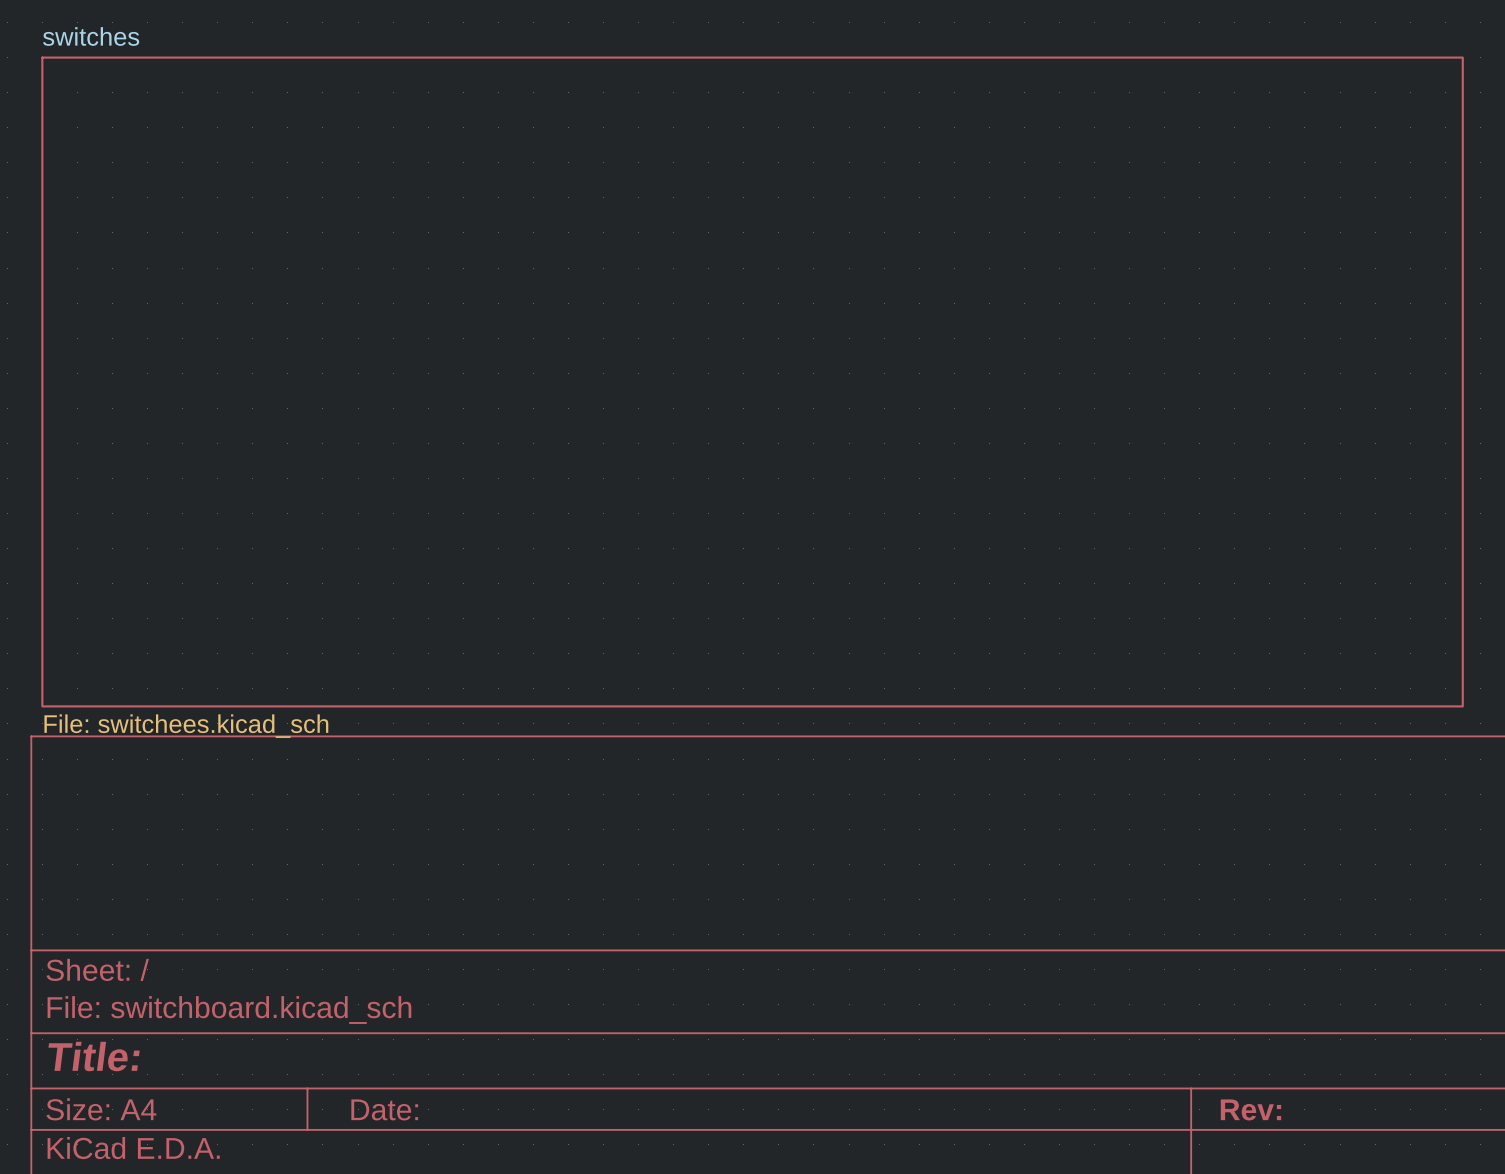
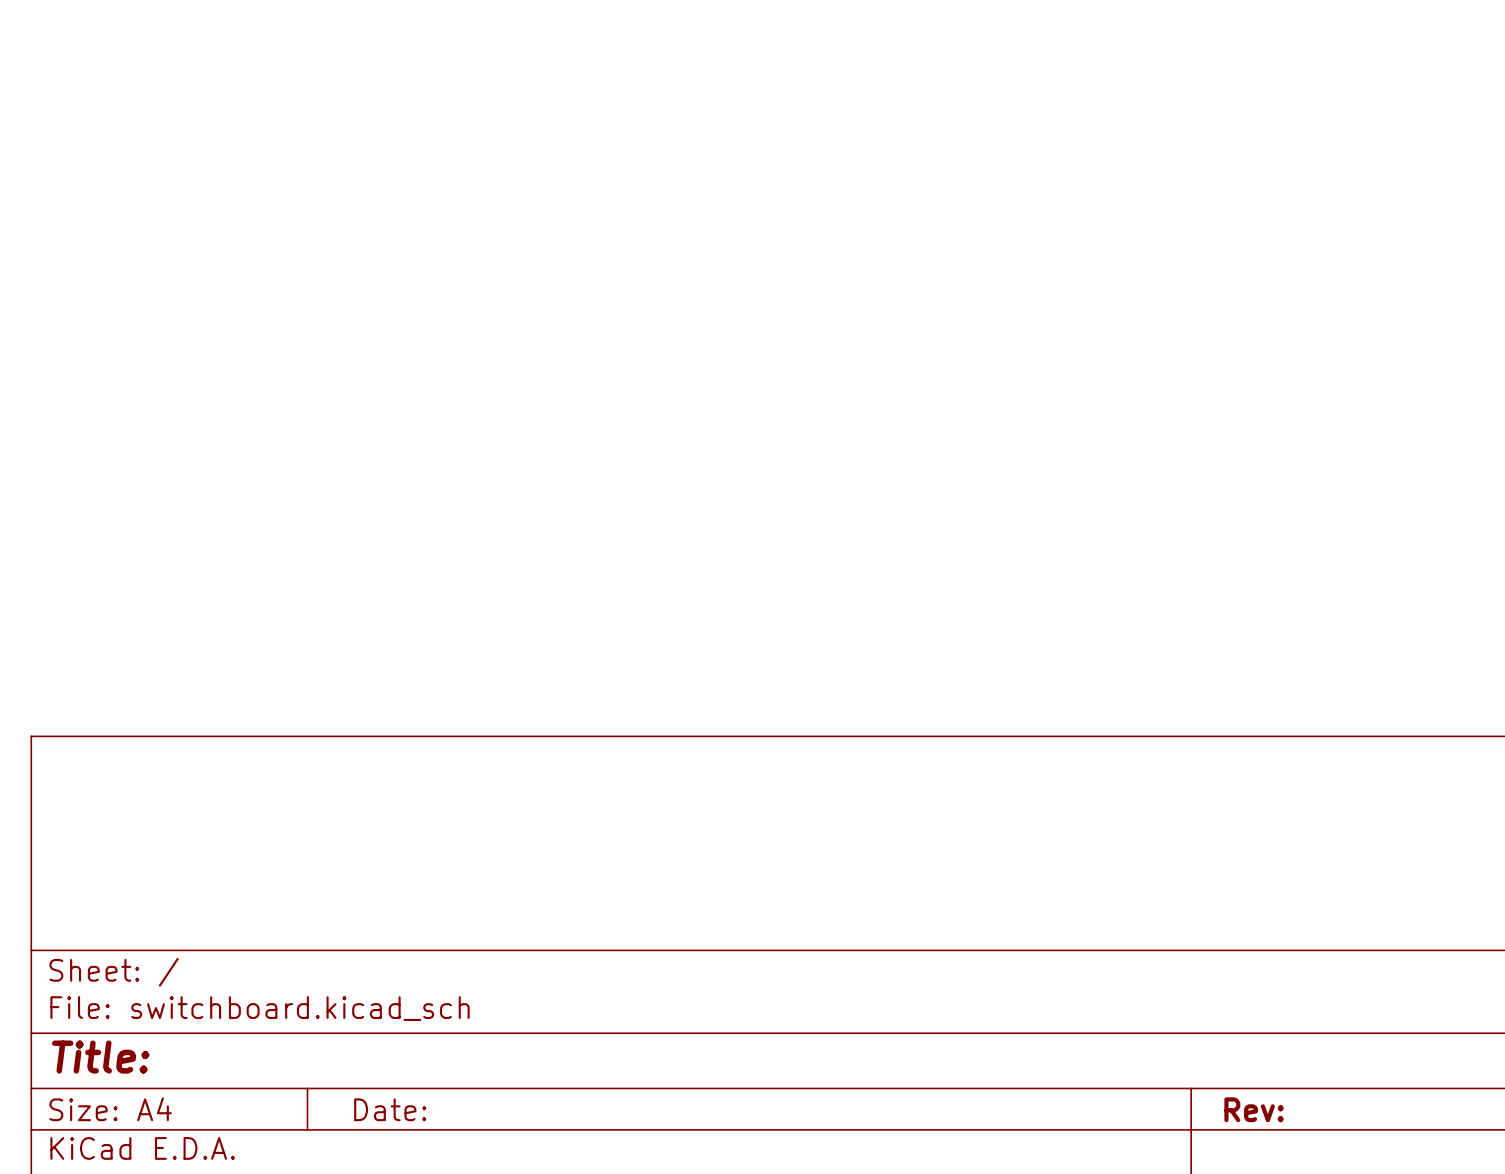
sheet switches: File: switchees.kicad_sch (752, 381) -> none

